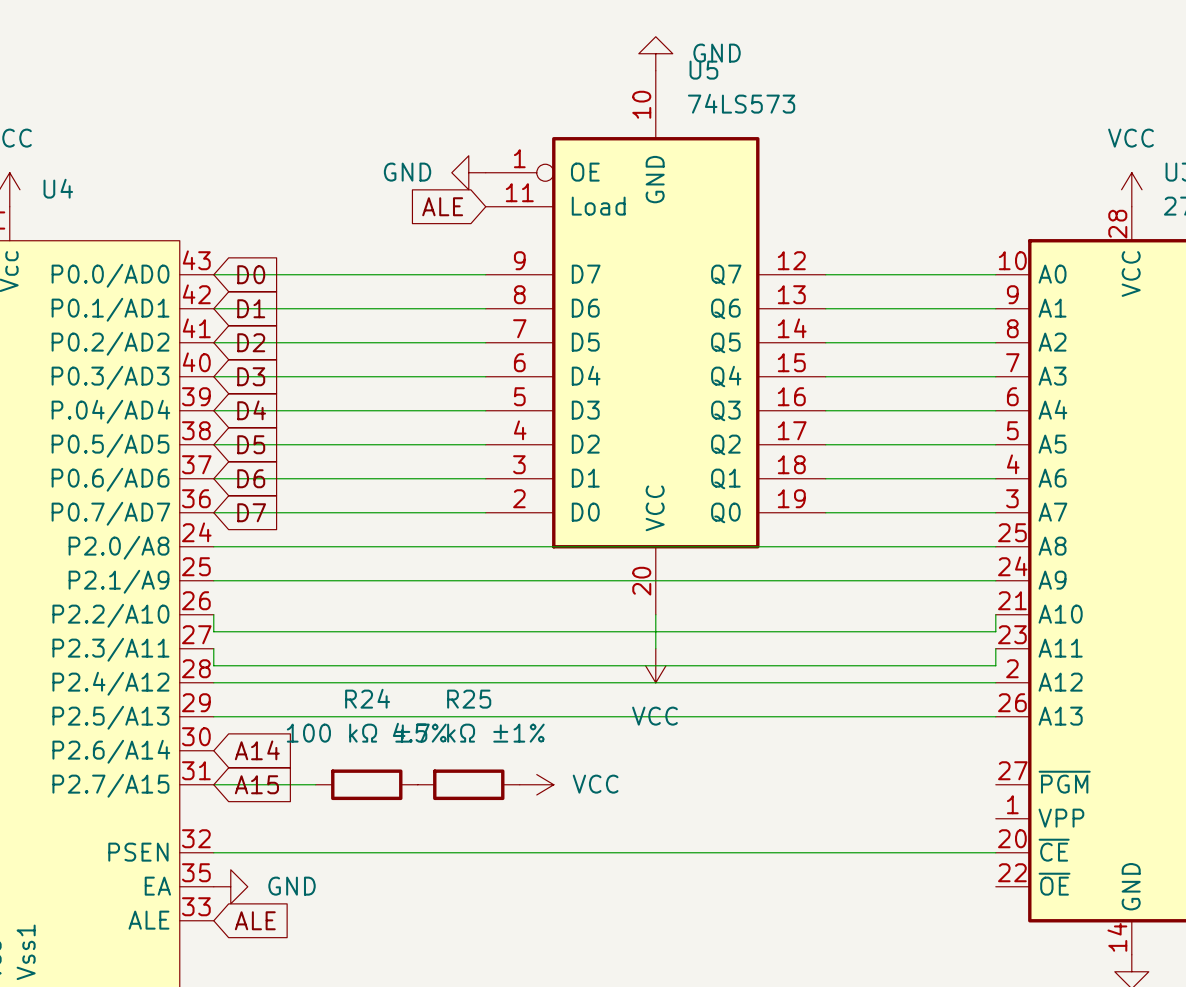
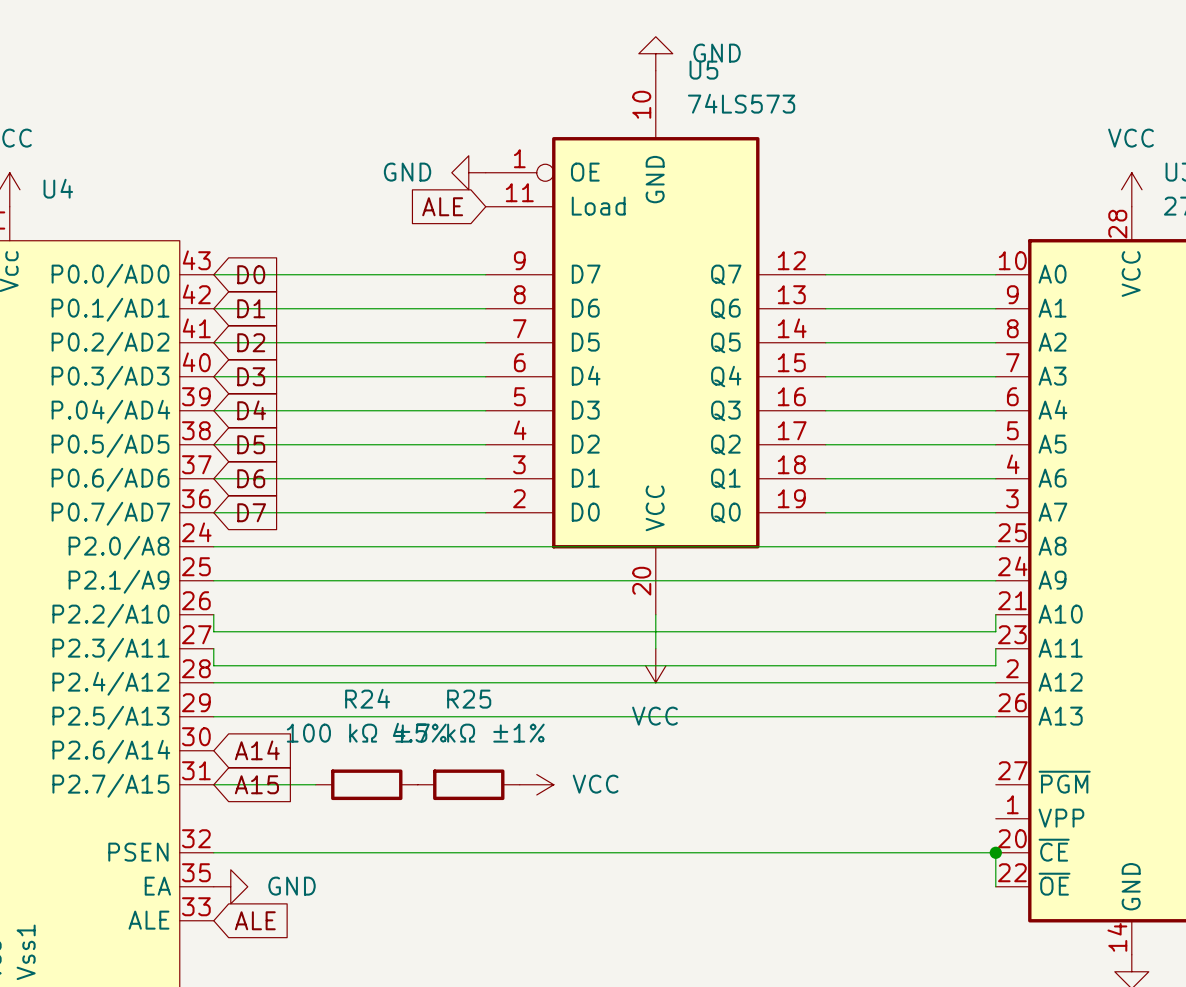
wire: none -> (995, 852) (995, 886)
junction: none -> (995, 852)

